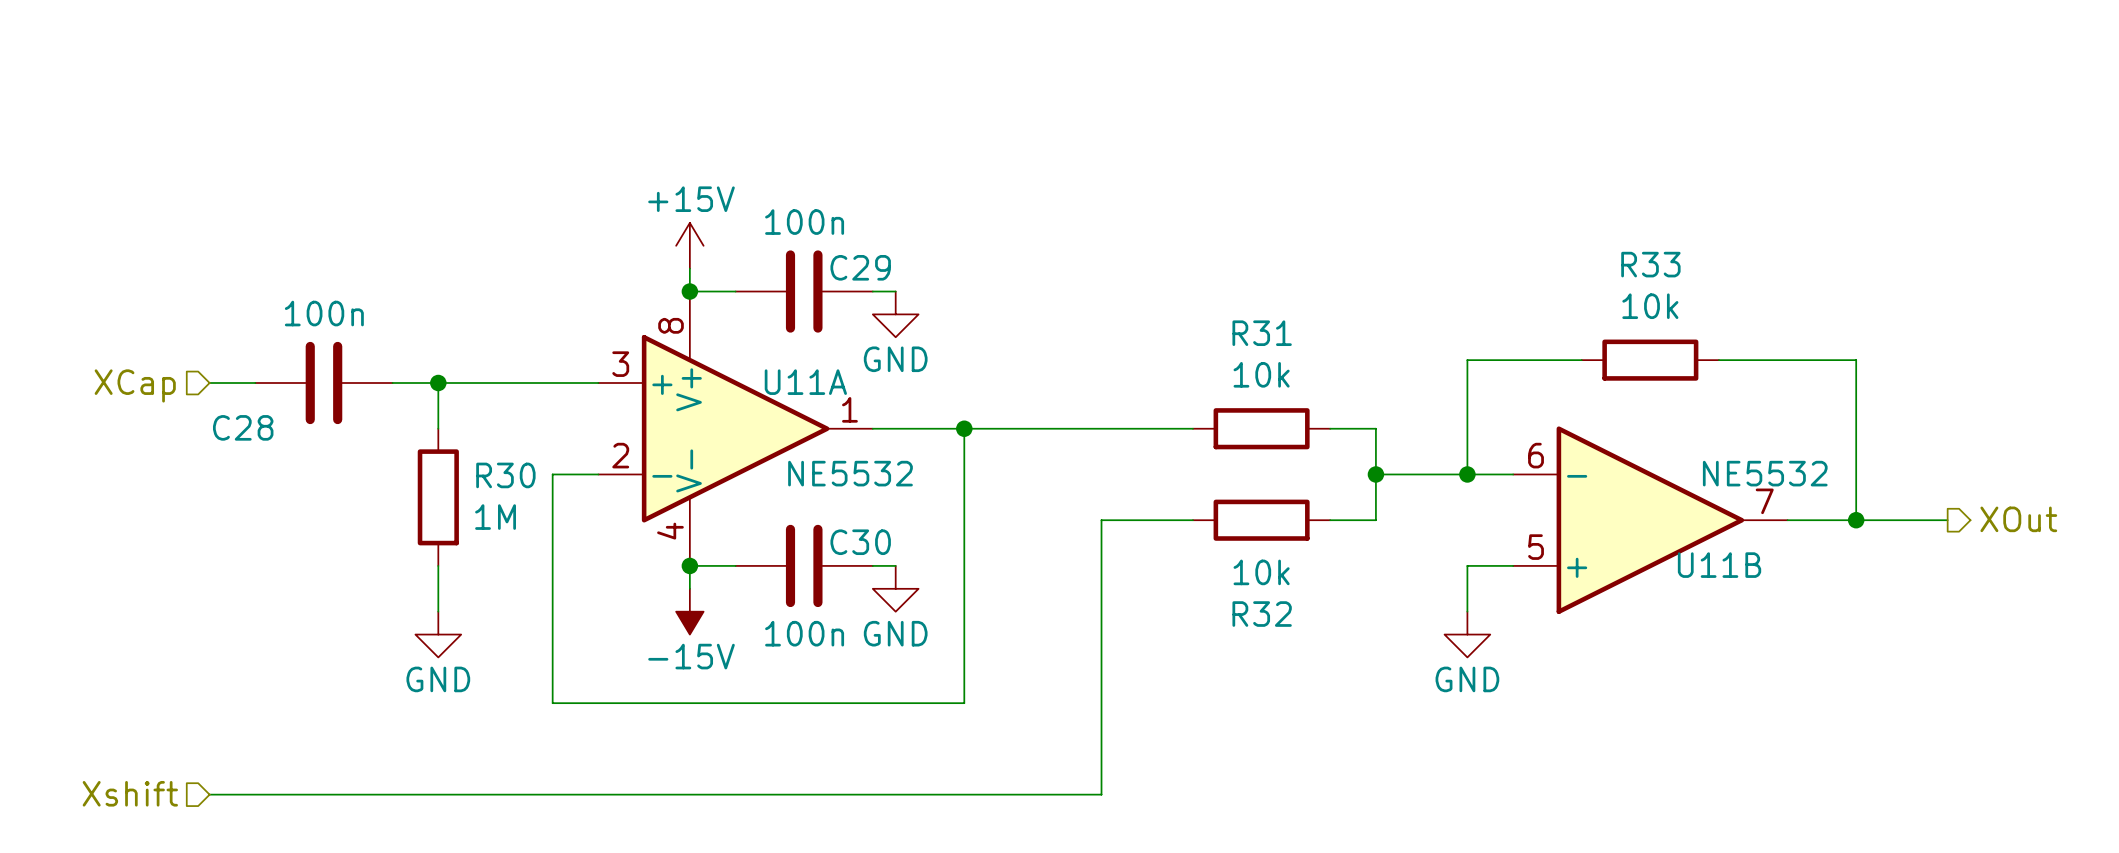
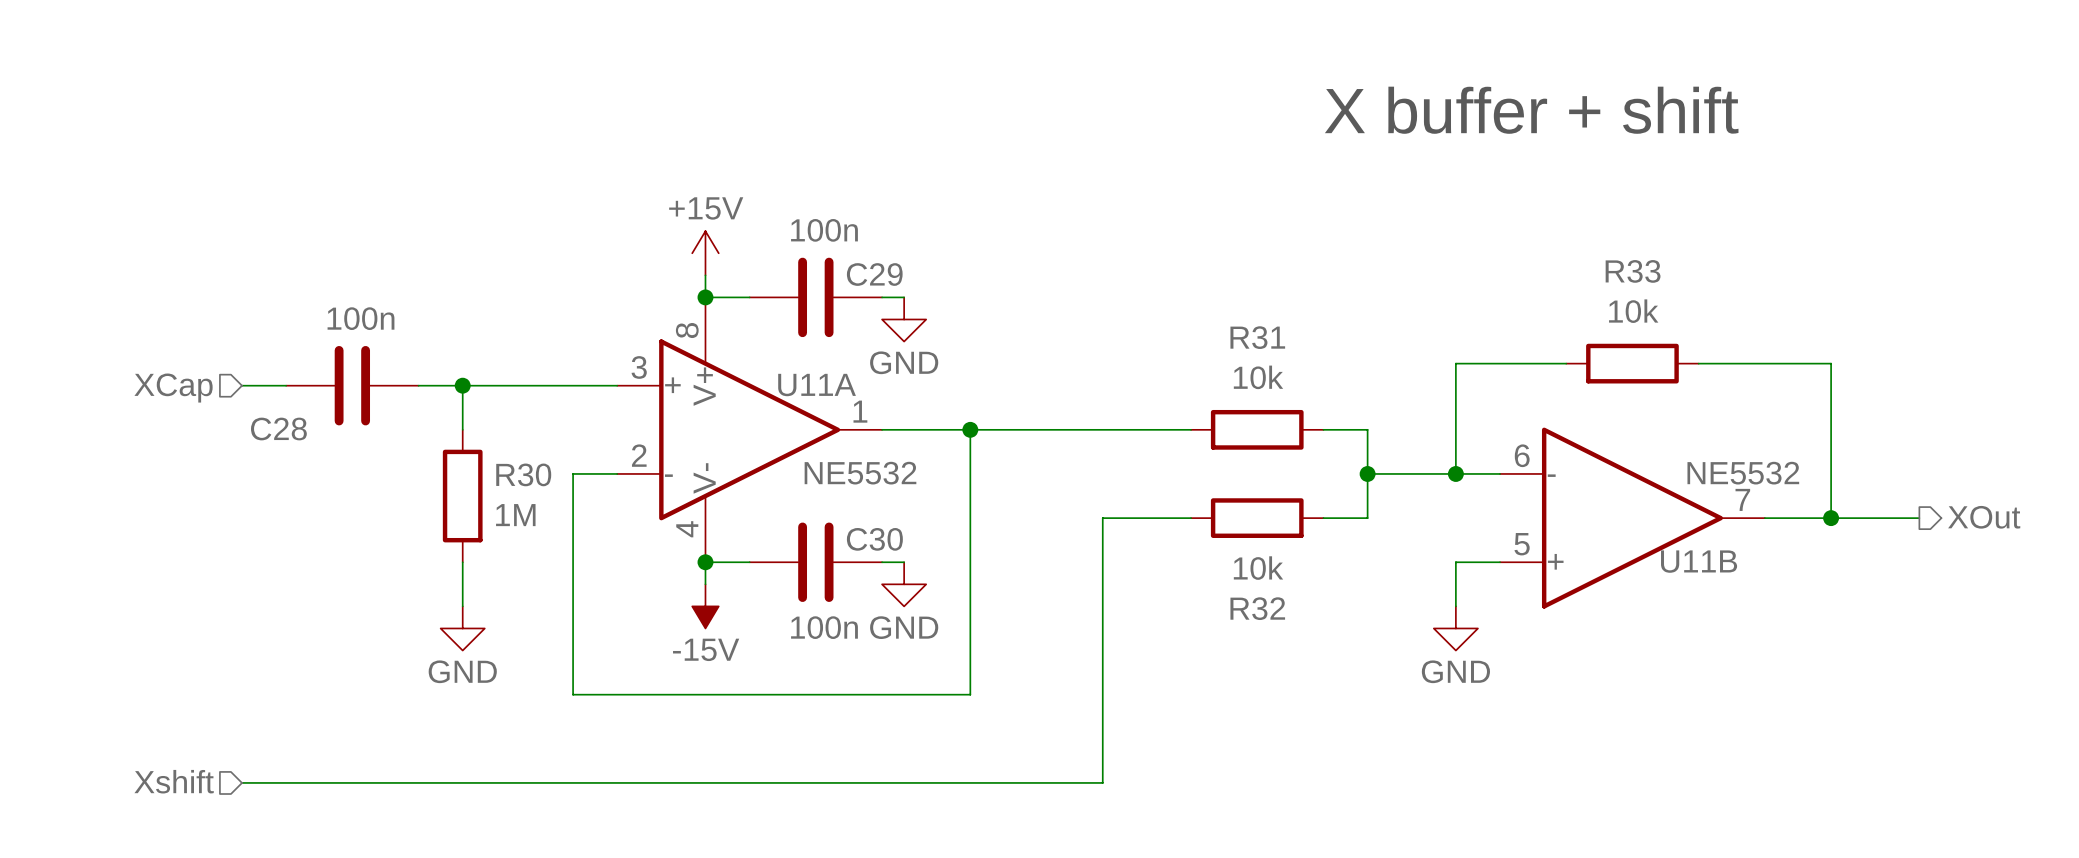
text: none -> X buffer + shift (1531, 110)

